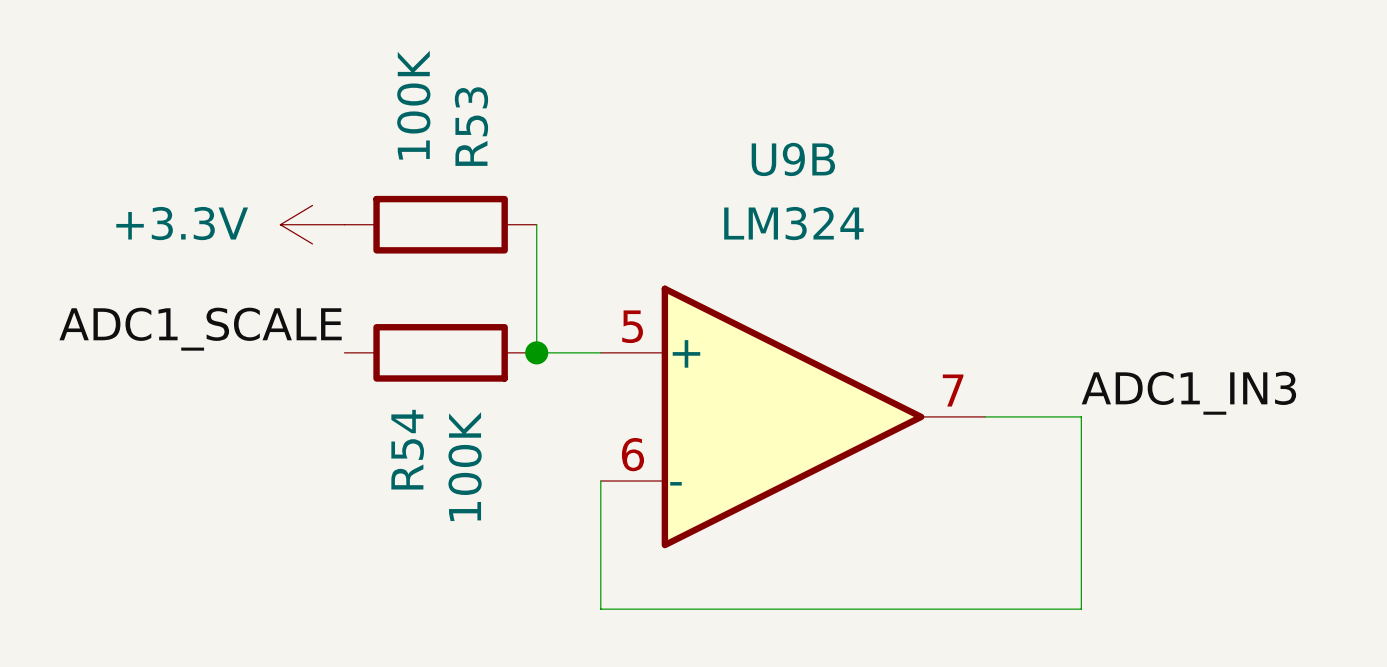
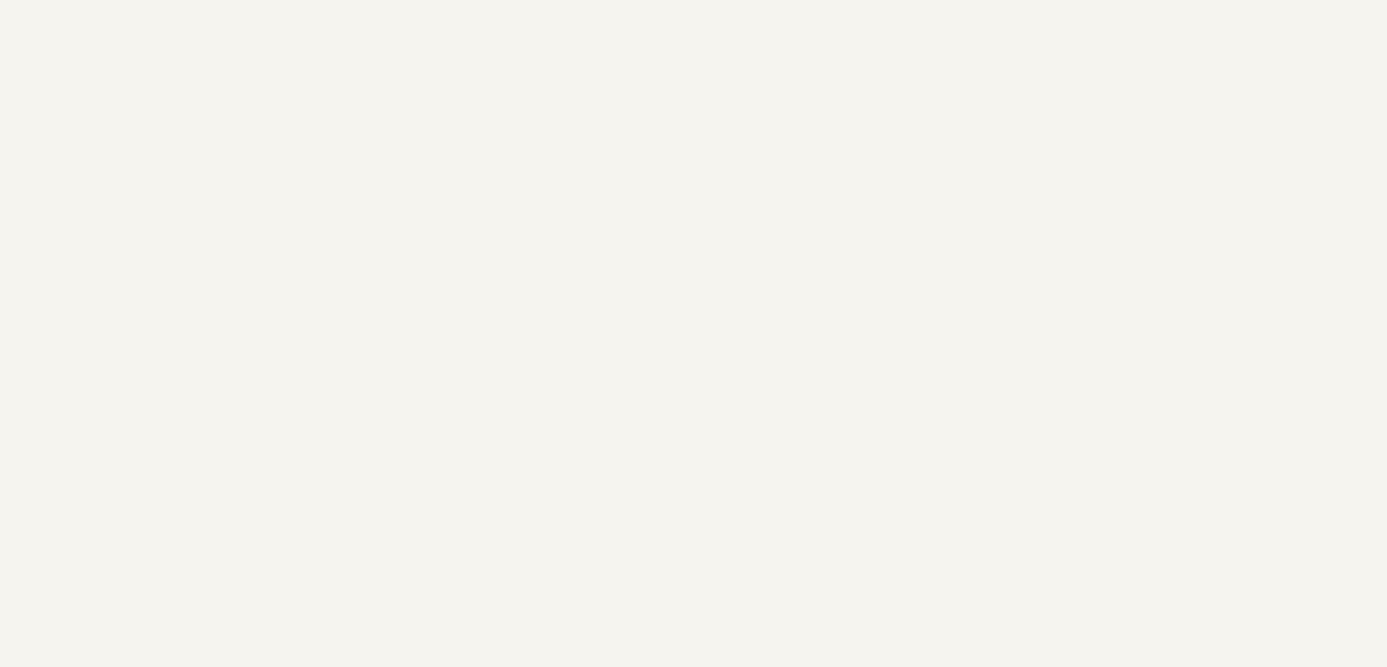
power symbol: +3.3V (312, 224) -> none
R53: 100K (440, 224) -> none
wire: (536, 224) (536, 352) (600, 352) -> none
label: ADC1_SCALE (200, 329) -> none
R54: 100K (440, 352) -> none
junction: (536, 352) -> none
label: ADC1_IN3 (1188, 393) -> none
U9B: LM324 (793, 416) -> none
wire: (985, 416) (1081, 416) (1081, 609) (600, 609) (600, 481) -> none

